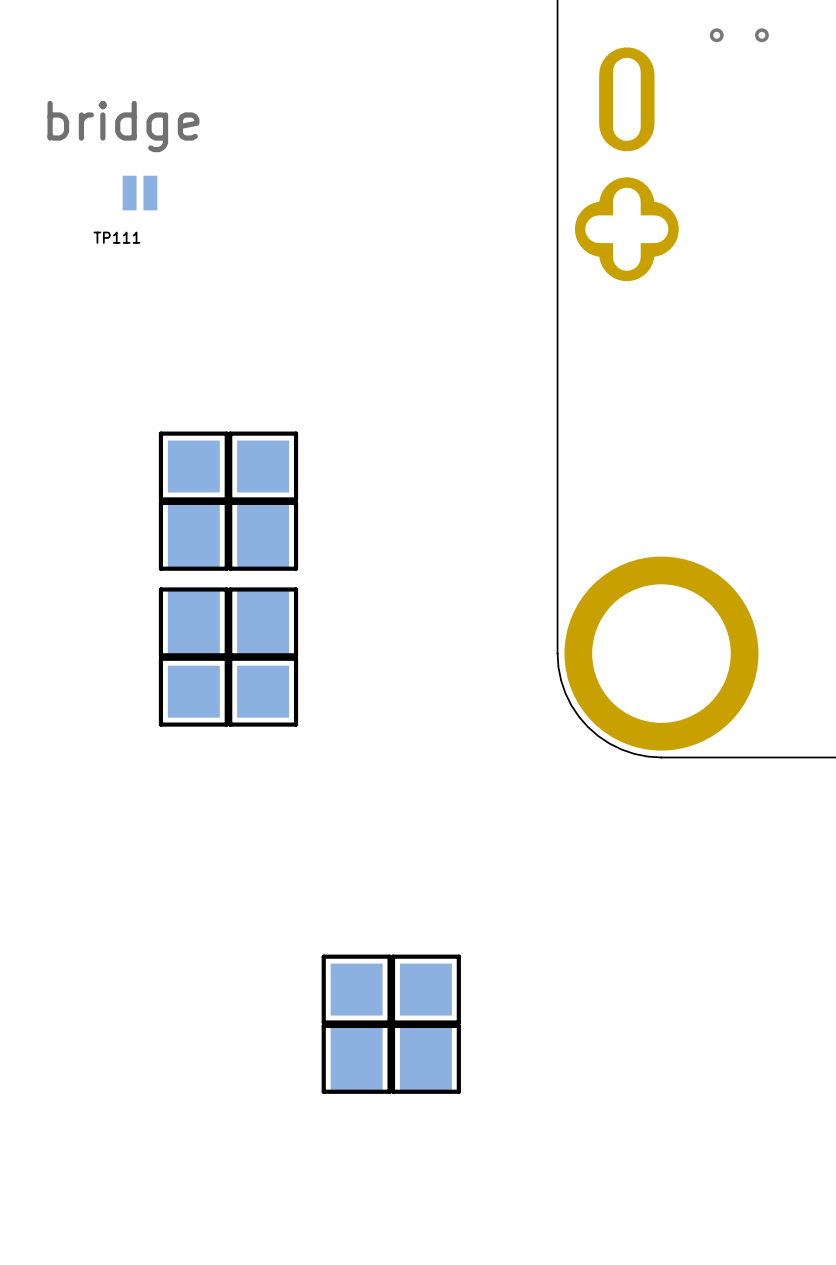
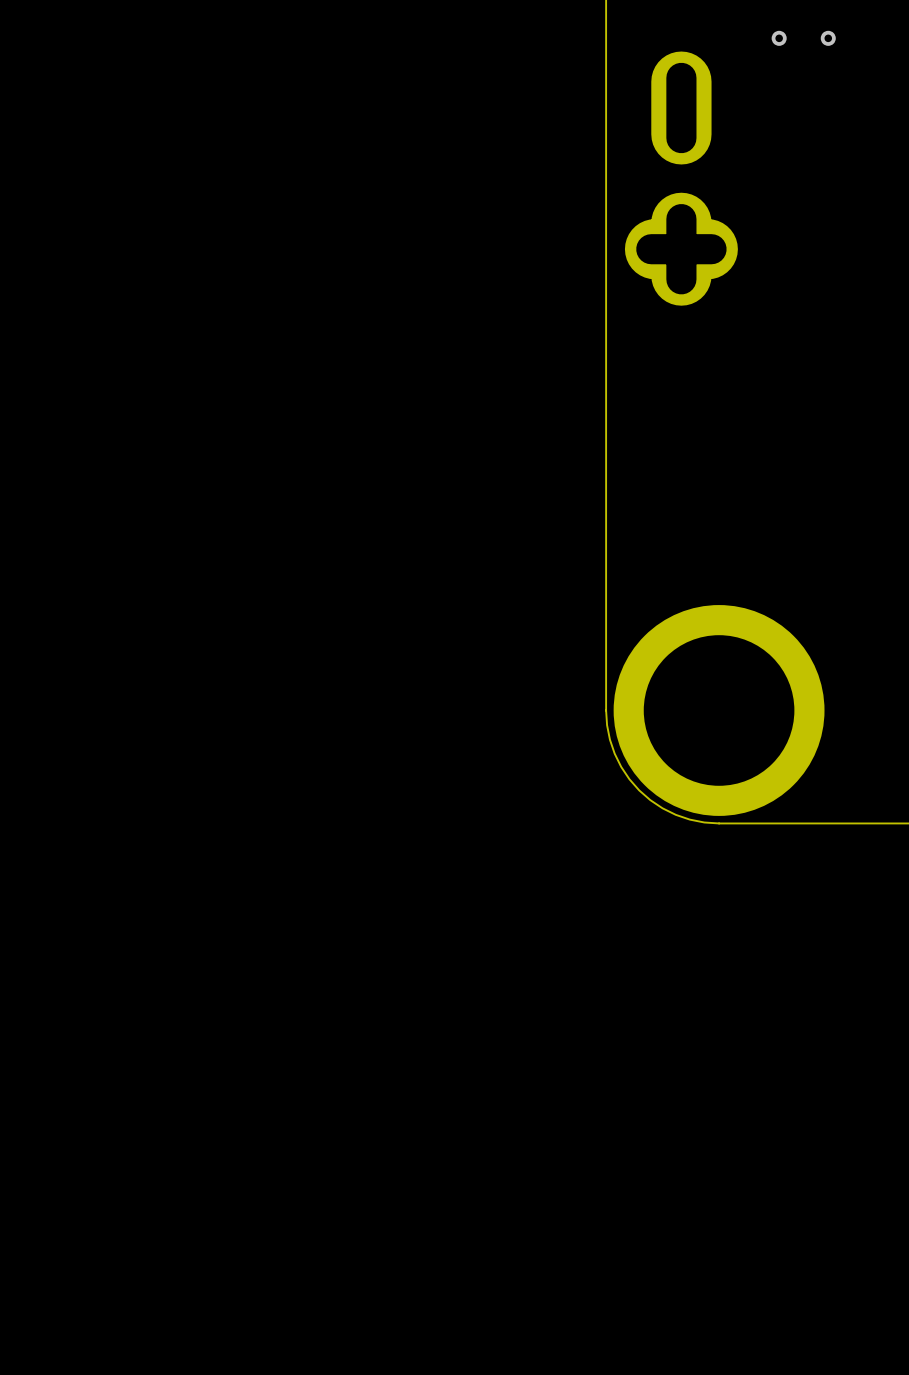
TP111: bridge (139, 193) -> none
part: (193, 466) -> none
part: (263, 466) -> none
part: (193, 535) -> none
part: (263, 535) -> none
part: (193, 622) -> none
part: (263, 622) -> none
part: (193, 691) -> none
part: (263, 691) -> none
part: (356, 989) -> none
part: (425, 989) -> none
part: (356, 1058) -> none
part: (425, 1058) -> none

